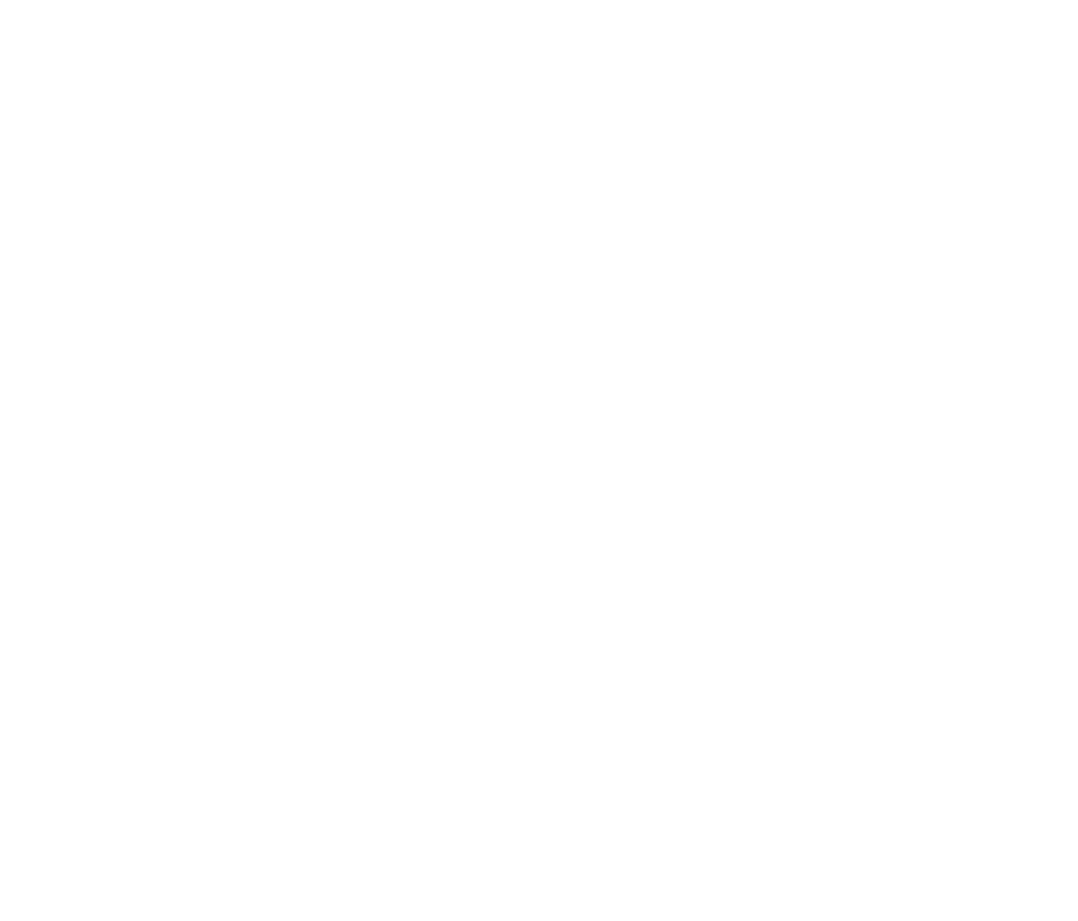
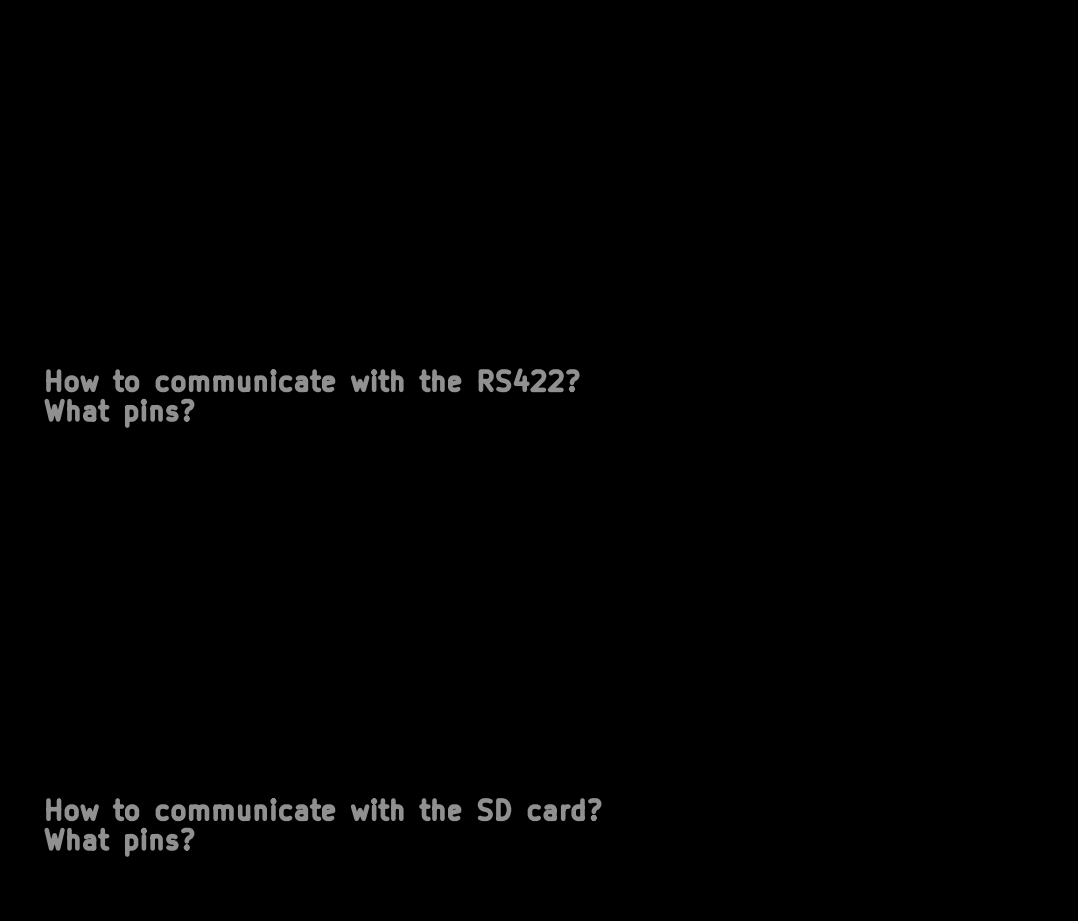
text: none -> How to communicate with the RS422? (312, 380)
text: none -> What pins? (119, 413)
text: none -> How to communicate with the SD card? (323, 809)
text: none -> What pins? (119, 842)

